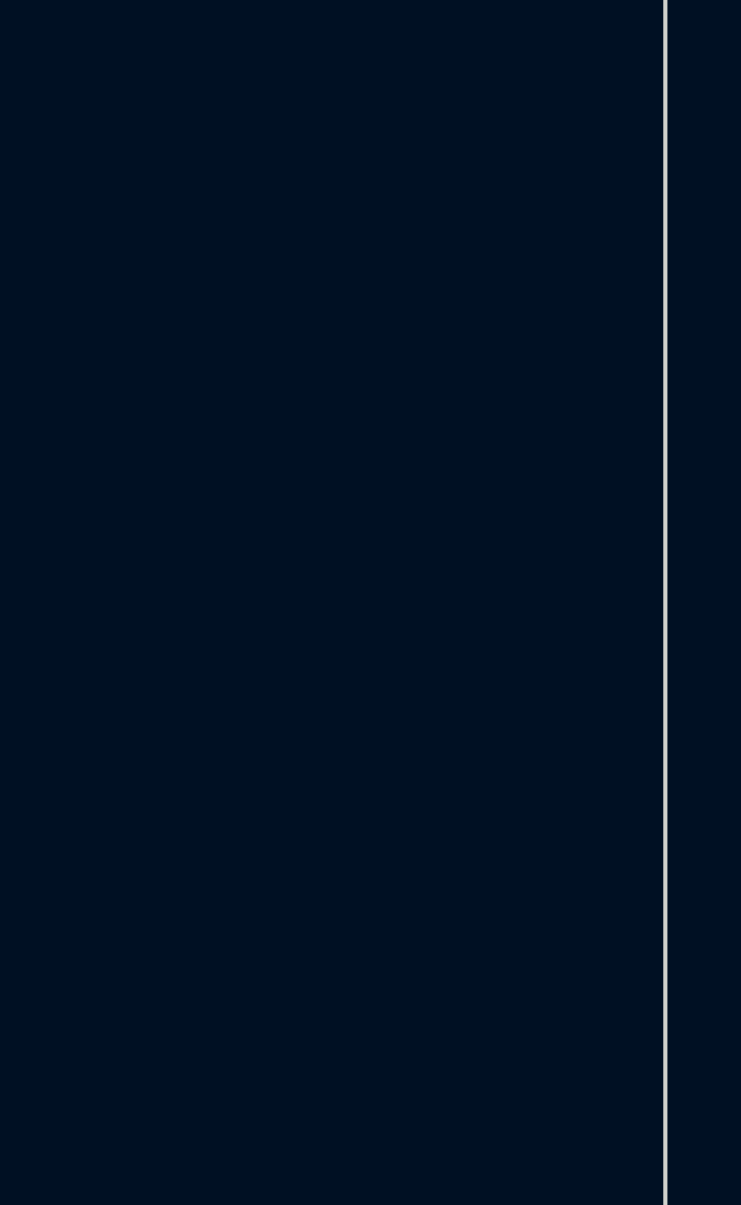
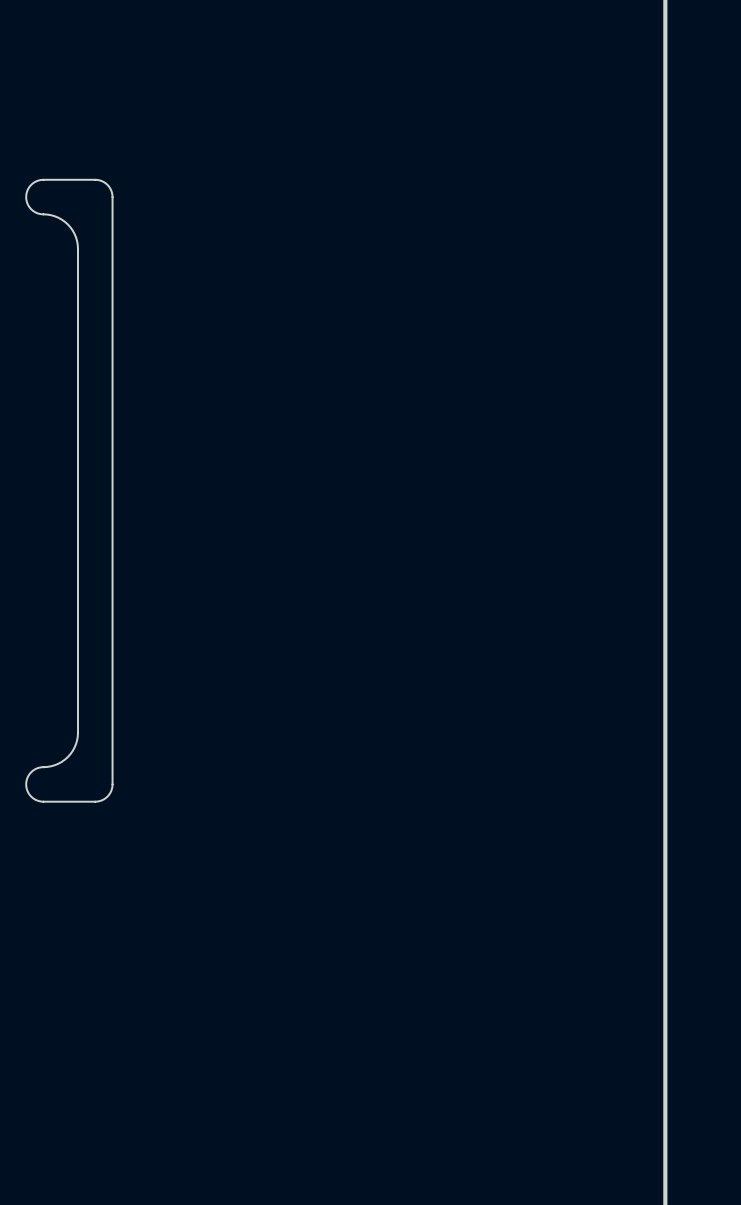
board edge: none -> (95, 179) (38, 180) (29, 186) (26, 194) (27, 203) (32, 210) (54, 216) (67, 224) (74, 233) (78, 248) (77, 736) (74, 747) (64, 759) (54, 765) (36, 768) (28, 775) (26, 784) (28, 793) (32, 798) (41, 801) (99, 801) (108, 794) (112, 786) (112, 197) (107, 184) (95, 179)

